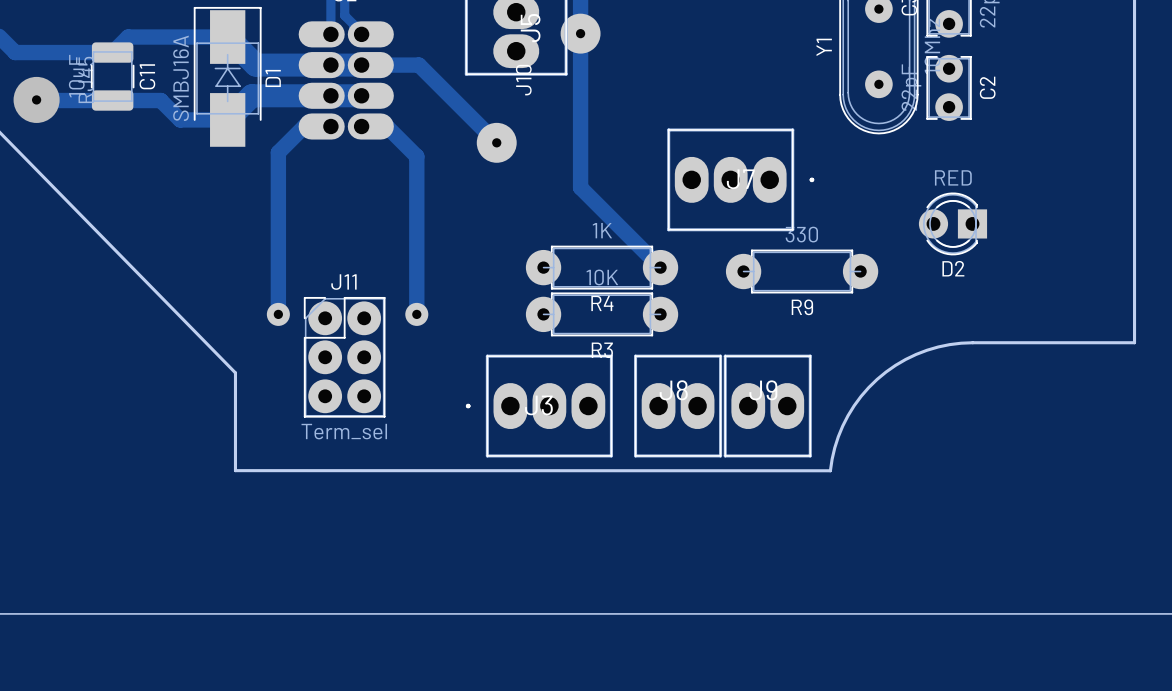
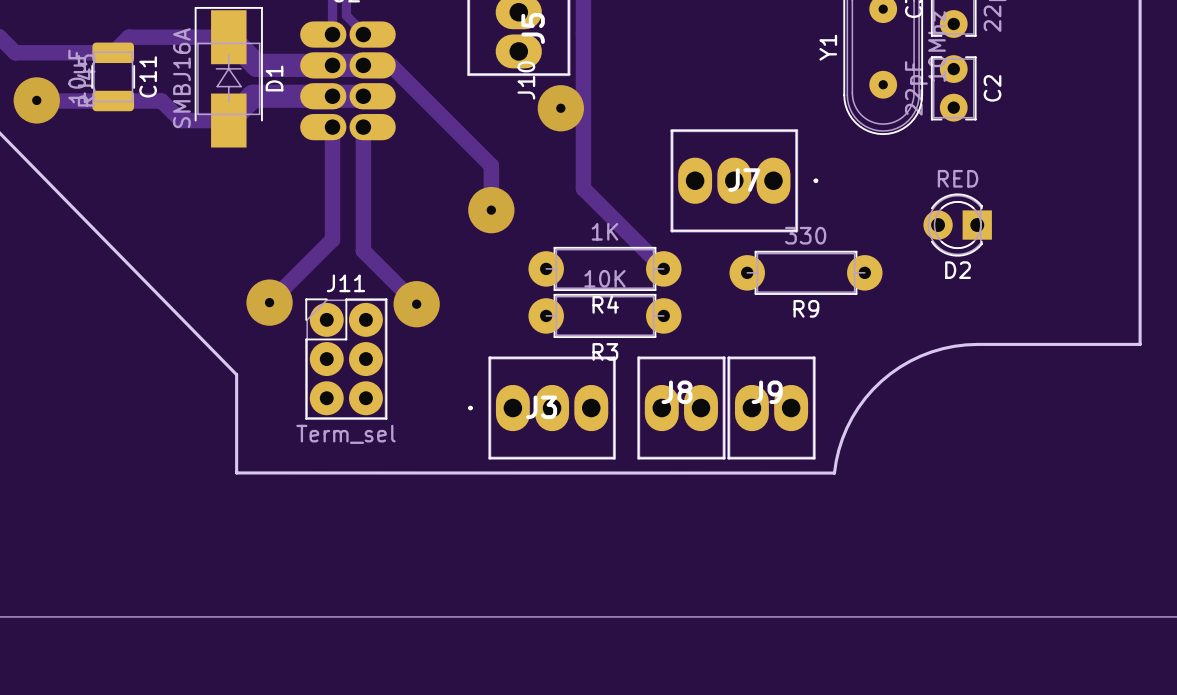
part: (580, 33) -> none
track: (389, 65) (419, 65) (496, 142) -> (391, 65) (491, 165) (491, 210)
via: none -> (560, 108)
track: (330, 126) (304, 126) (278, 152) (278, 310) -> (332, 127) (332, 239) (269, 302)
track: (361, 126) (386, 126) (416, 156) (416, 314) -> (363, 127) (363, 250) (416, 304)
part: (496, 142) -> none
via: none -> (491, 210)
via: none -> (269, 302)
via: none -> (416, 304)
part: (278, 314) -> none
part: (416, 314) -> none

